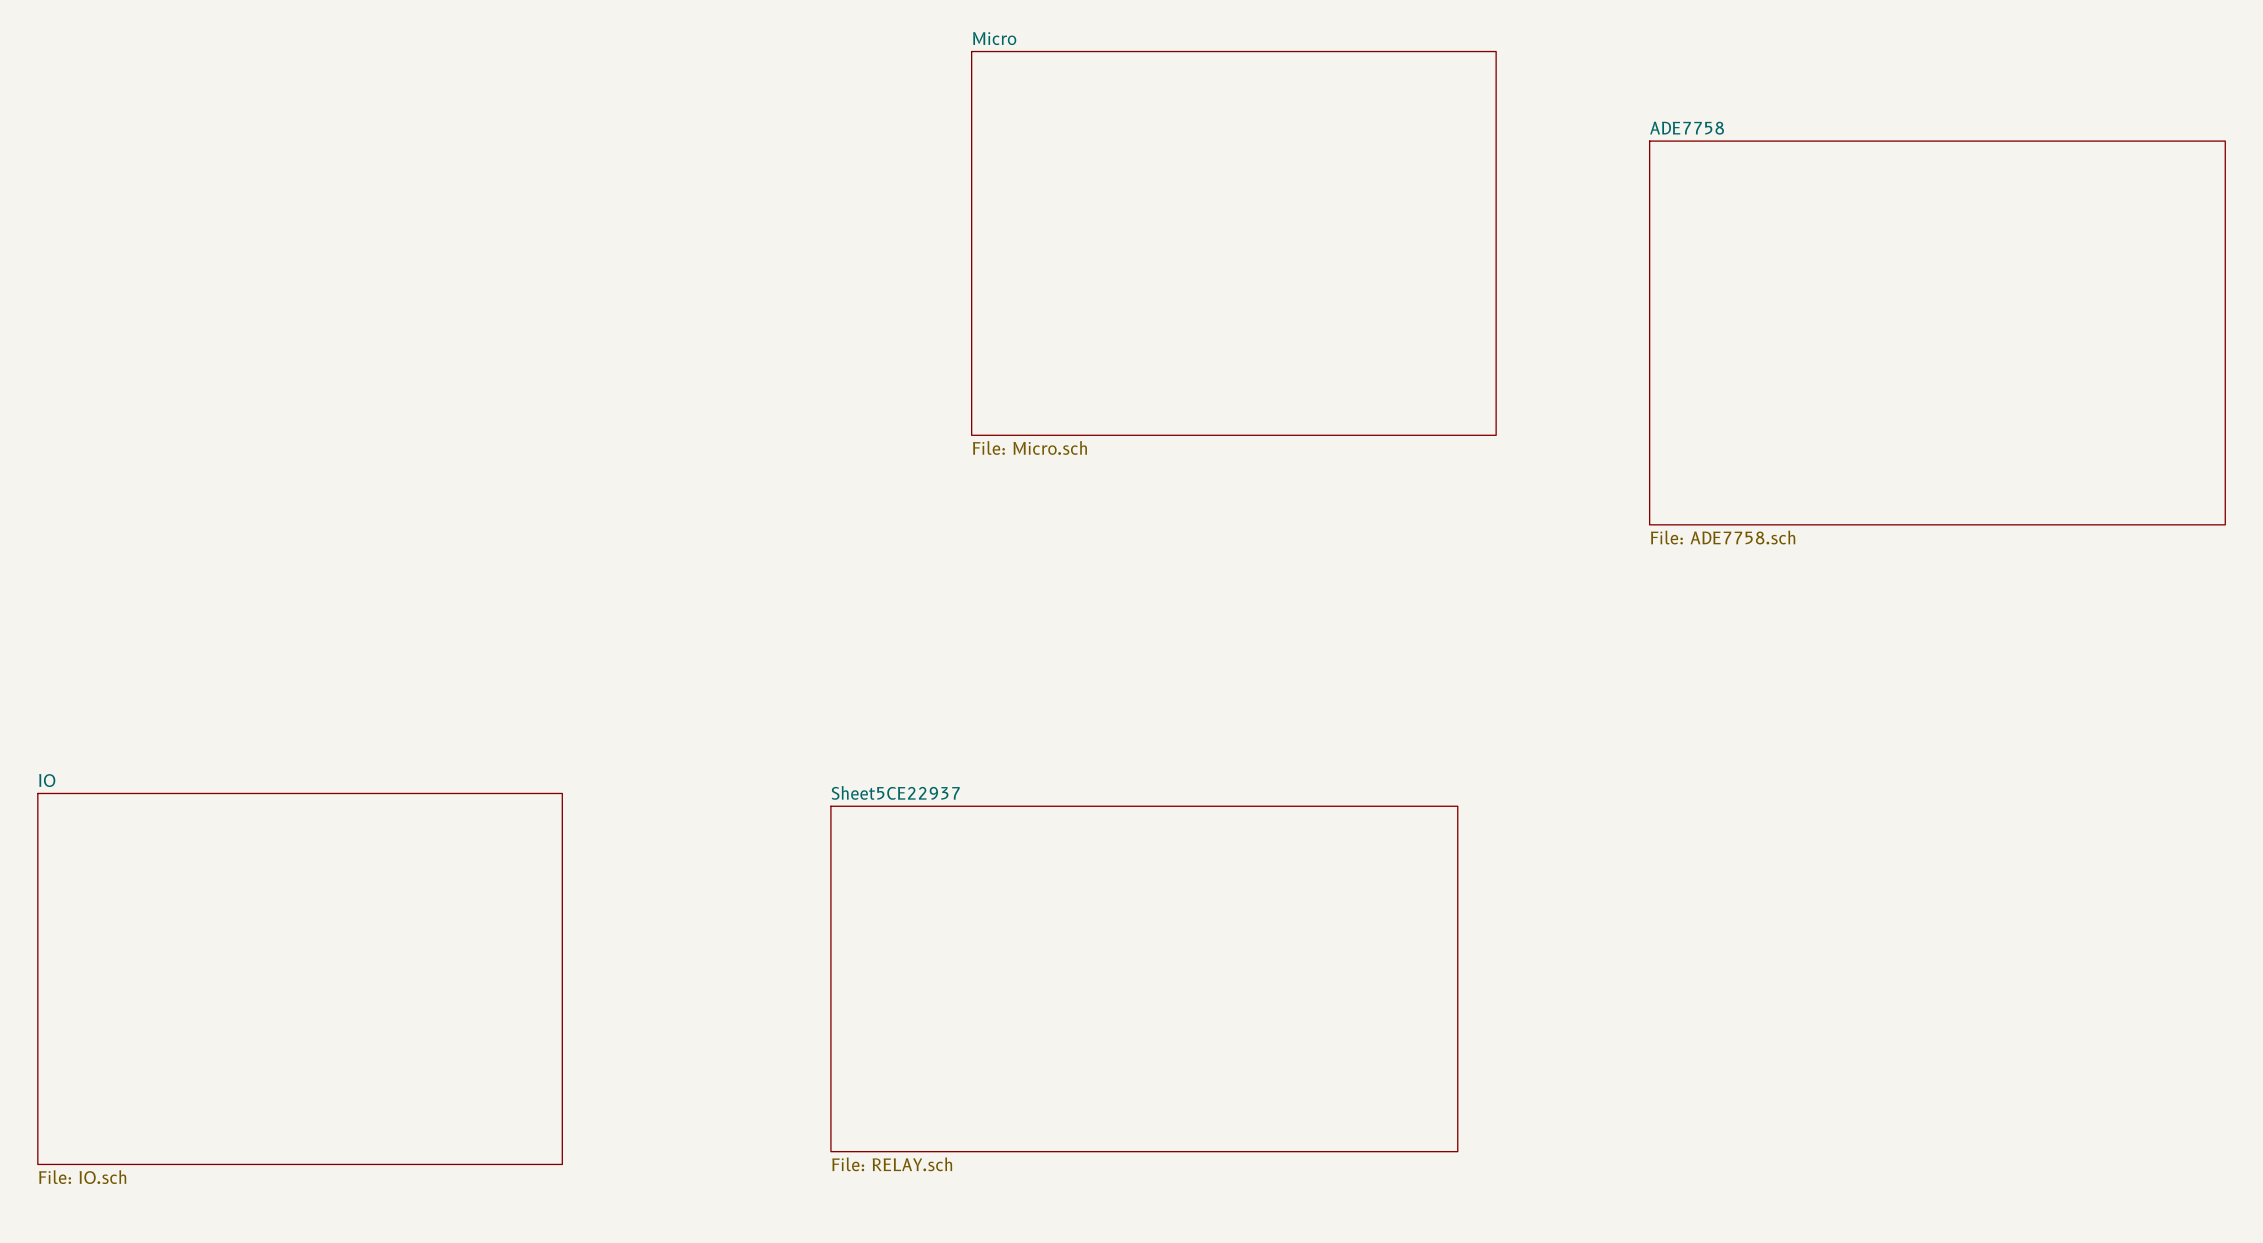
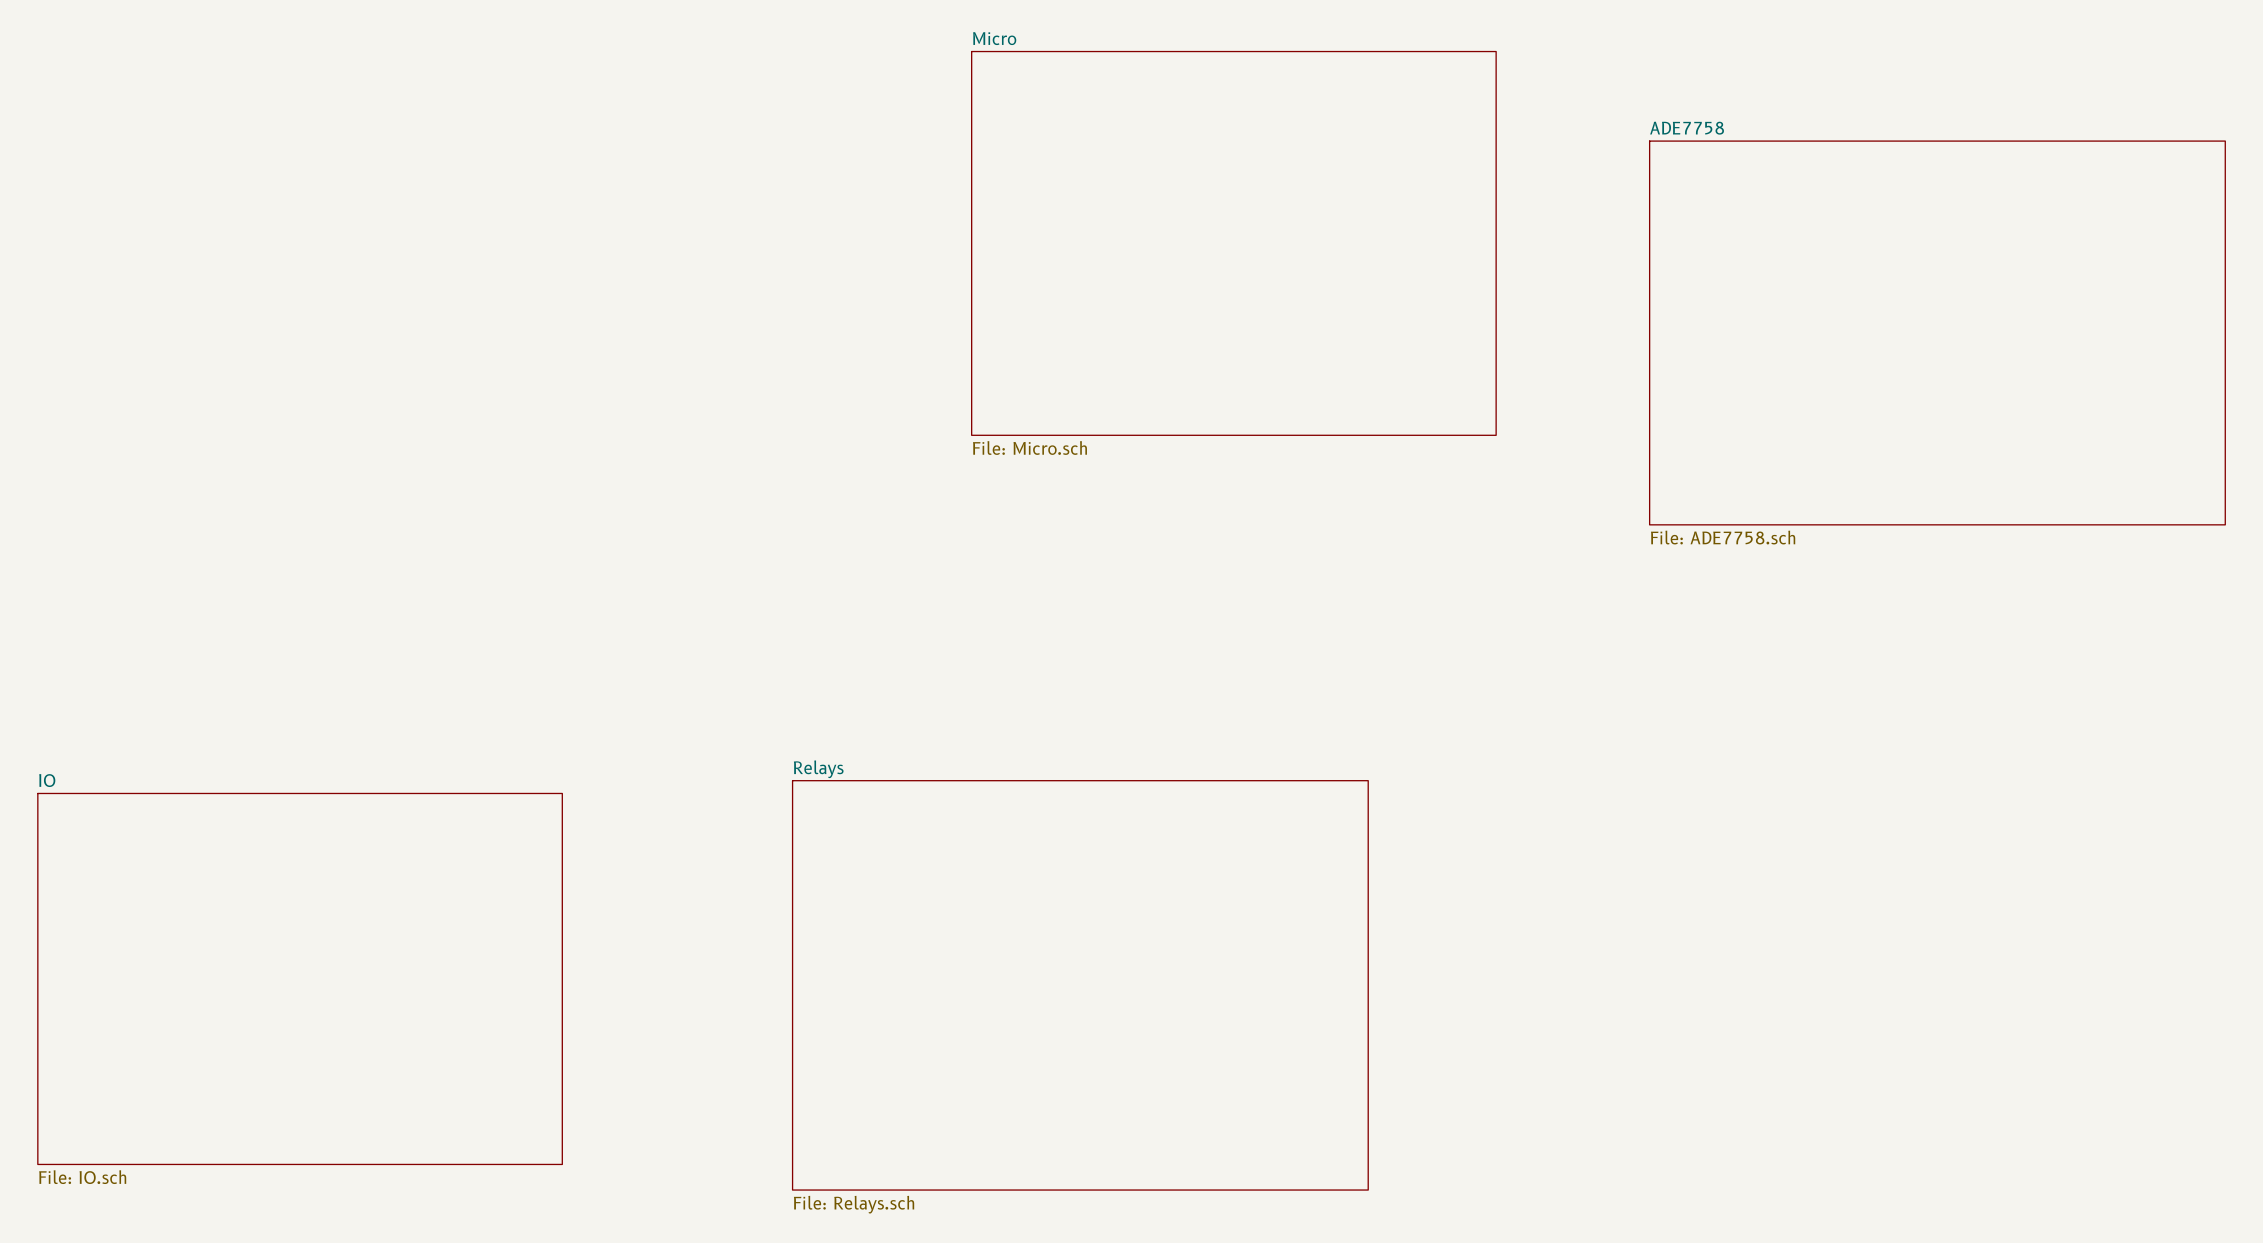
sheet Sheet5CE22937: File: RELAY.sch (1144, 978) -> none
sheet Relays: none -> File: Relays.sch (1080, 985)

